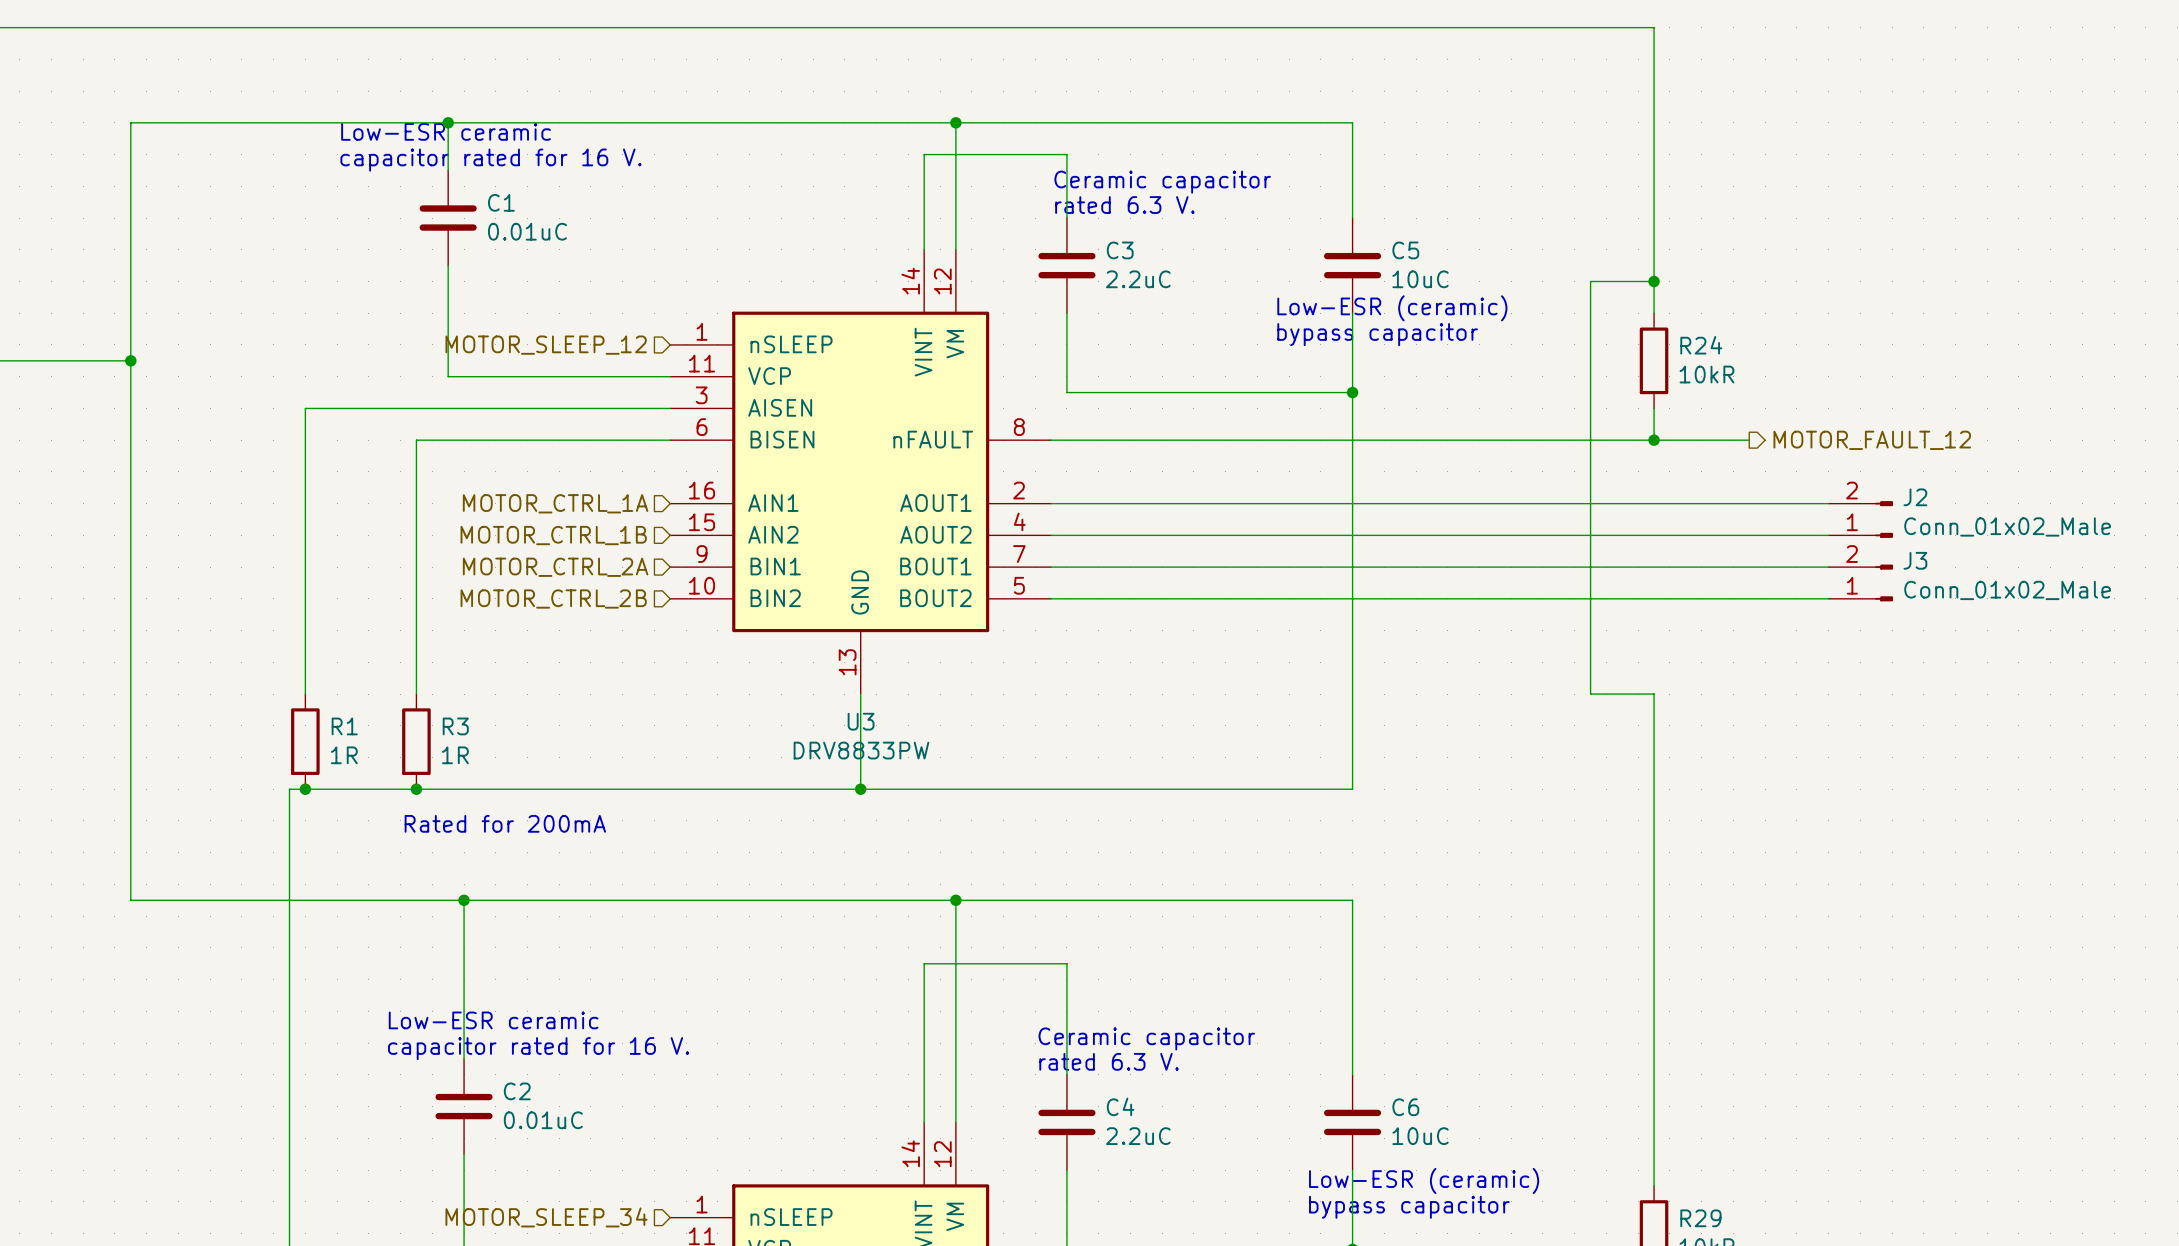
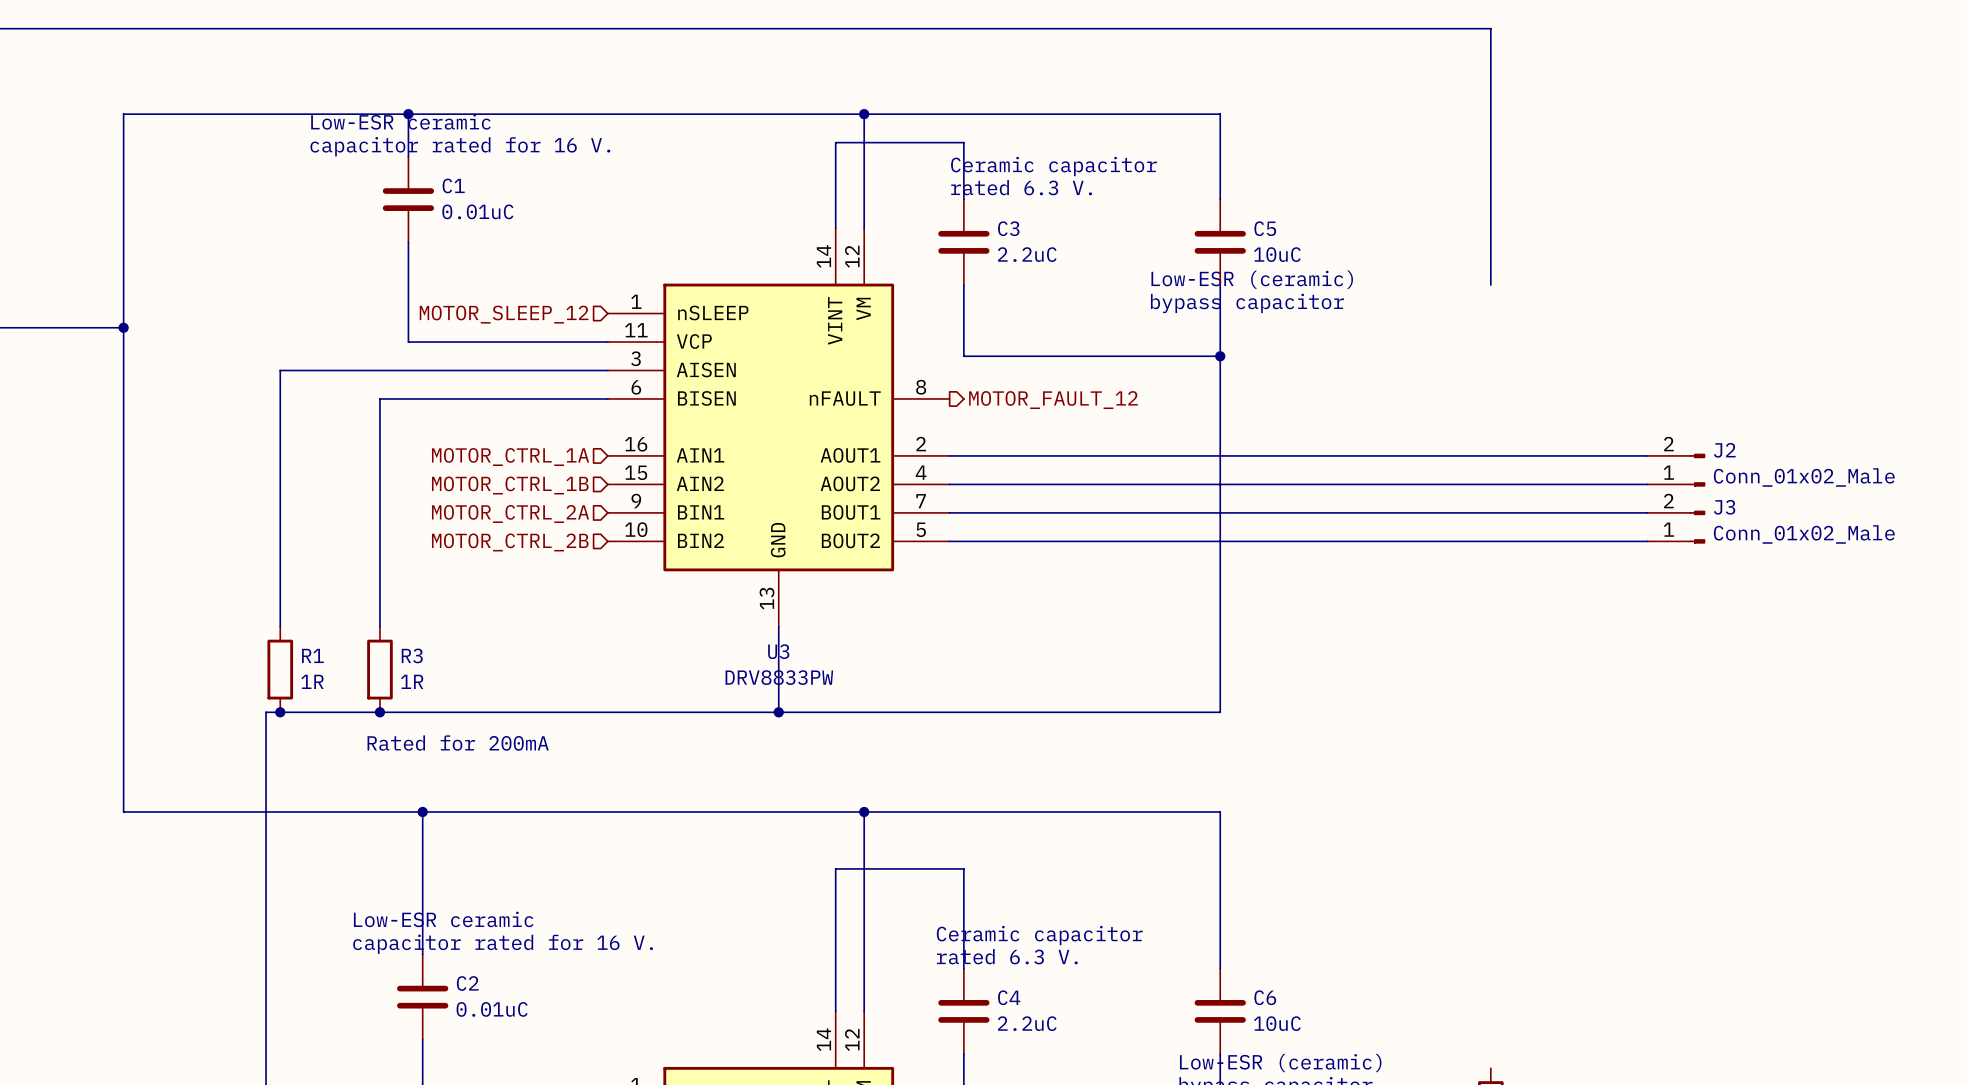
wire: (1654, 281) (1590, 281) (1590, 694) (1654, 694) (1654, 1185) -> none
junction: (1654, 281) -> none
R24: 10kR (1654, 360) -> none
wire: (1654, 408) (1654, 440) -> none
wire: (1051, 440) (1749, 440) -> none
hierarchical label: none -> MOTOR_FAULT_12 (1053, 400)
junction: (1654, 440) -> none
hierarchical label: MOTOR_FAULT_12 (1872, 440) -> none

